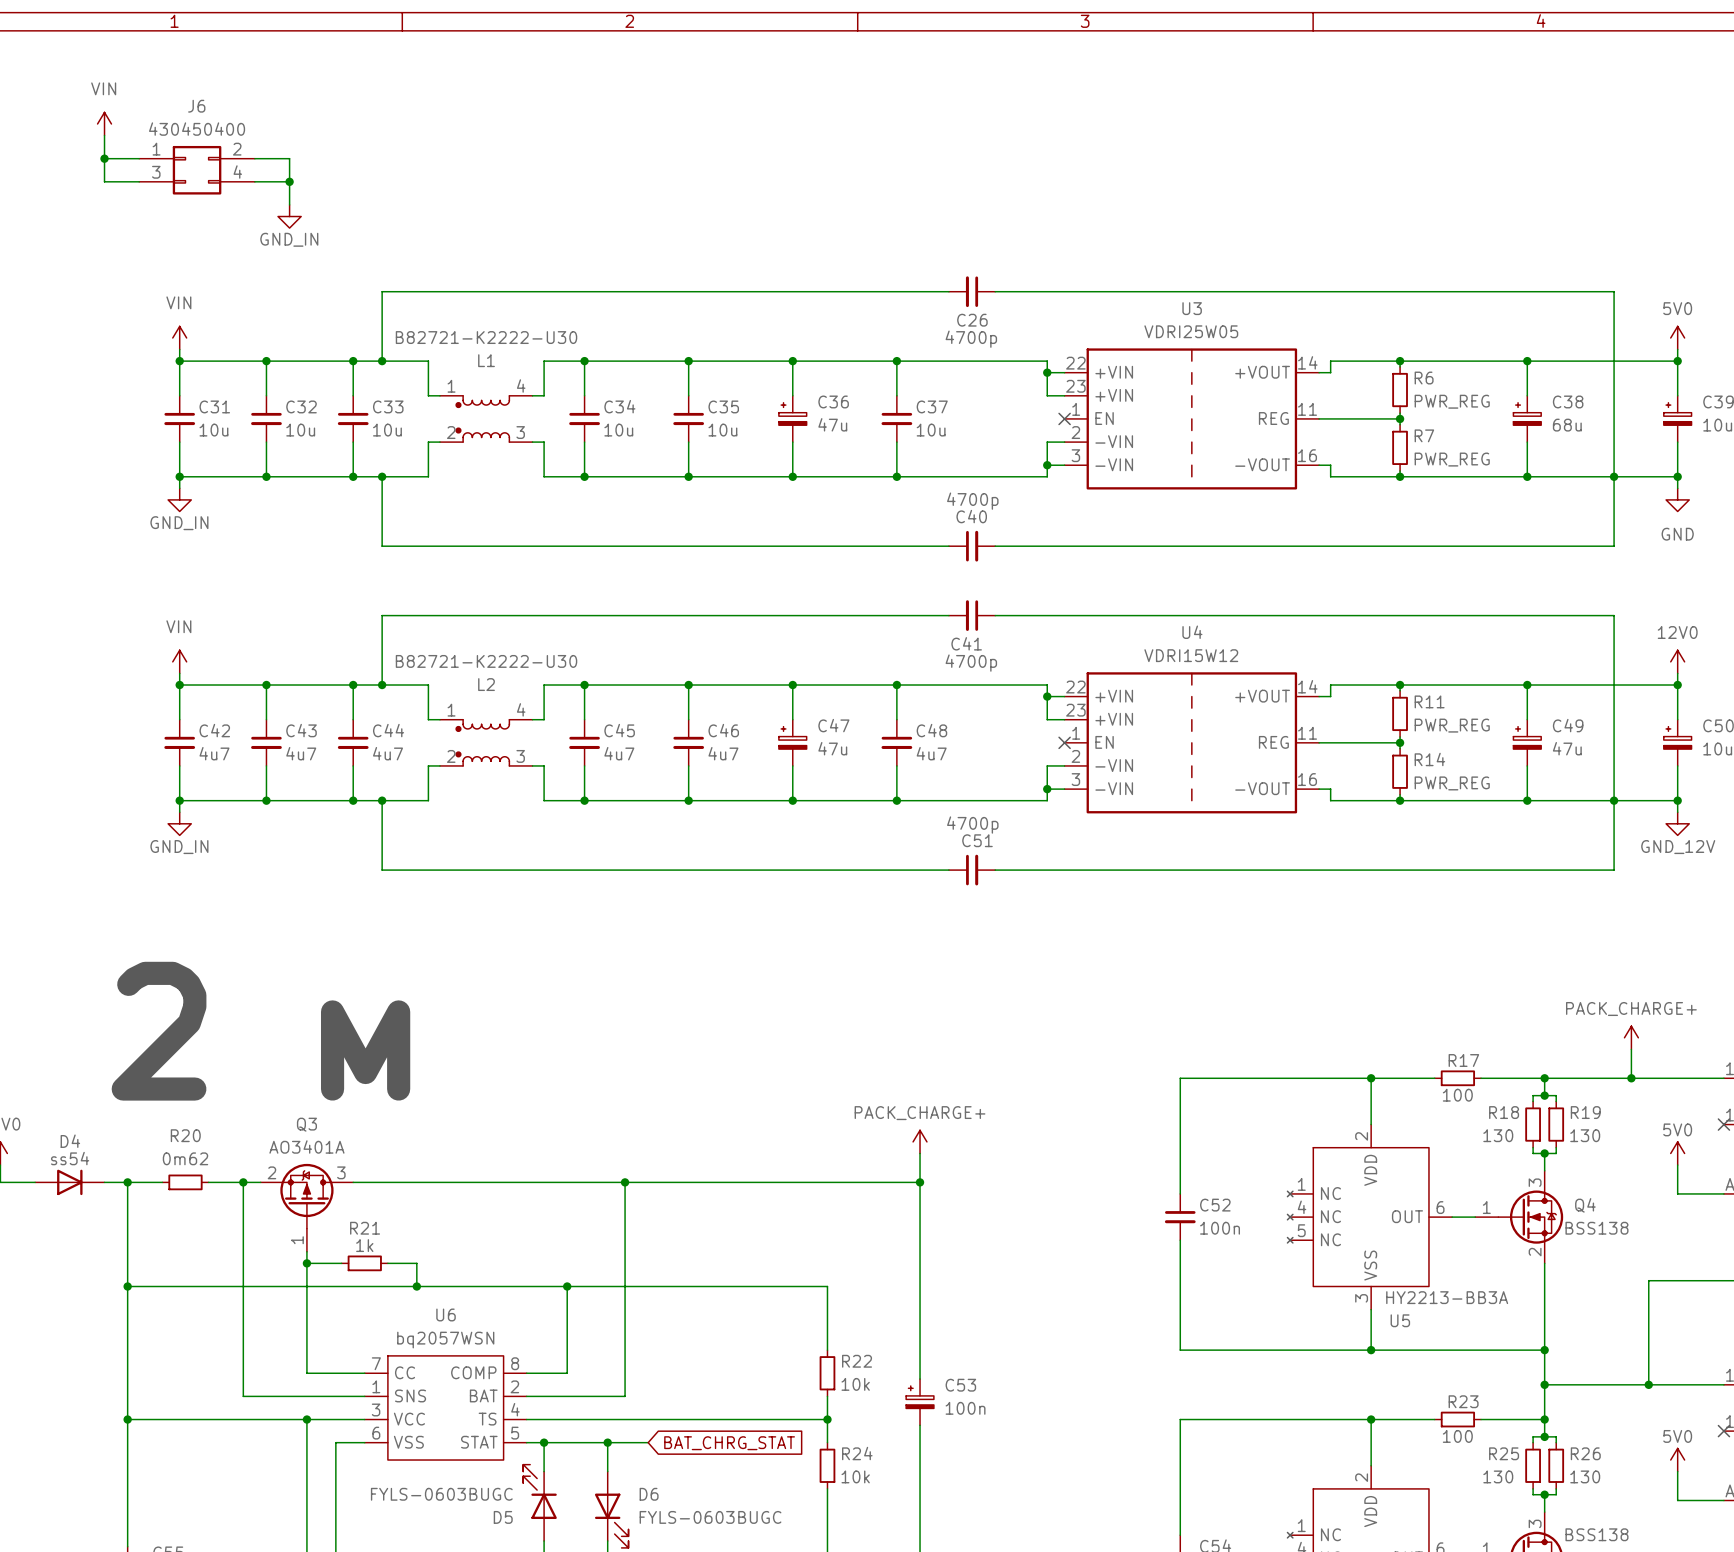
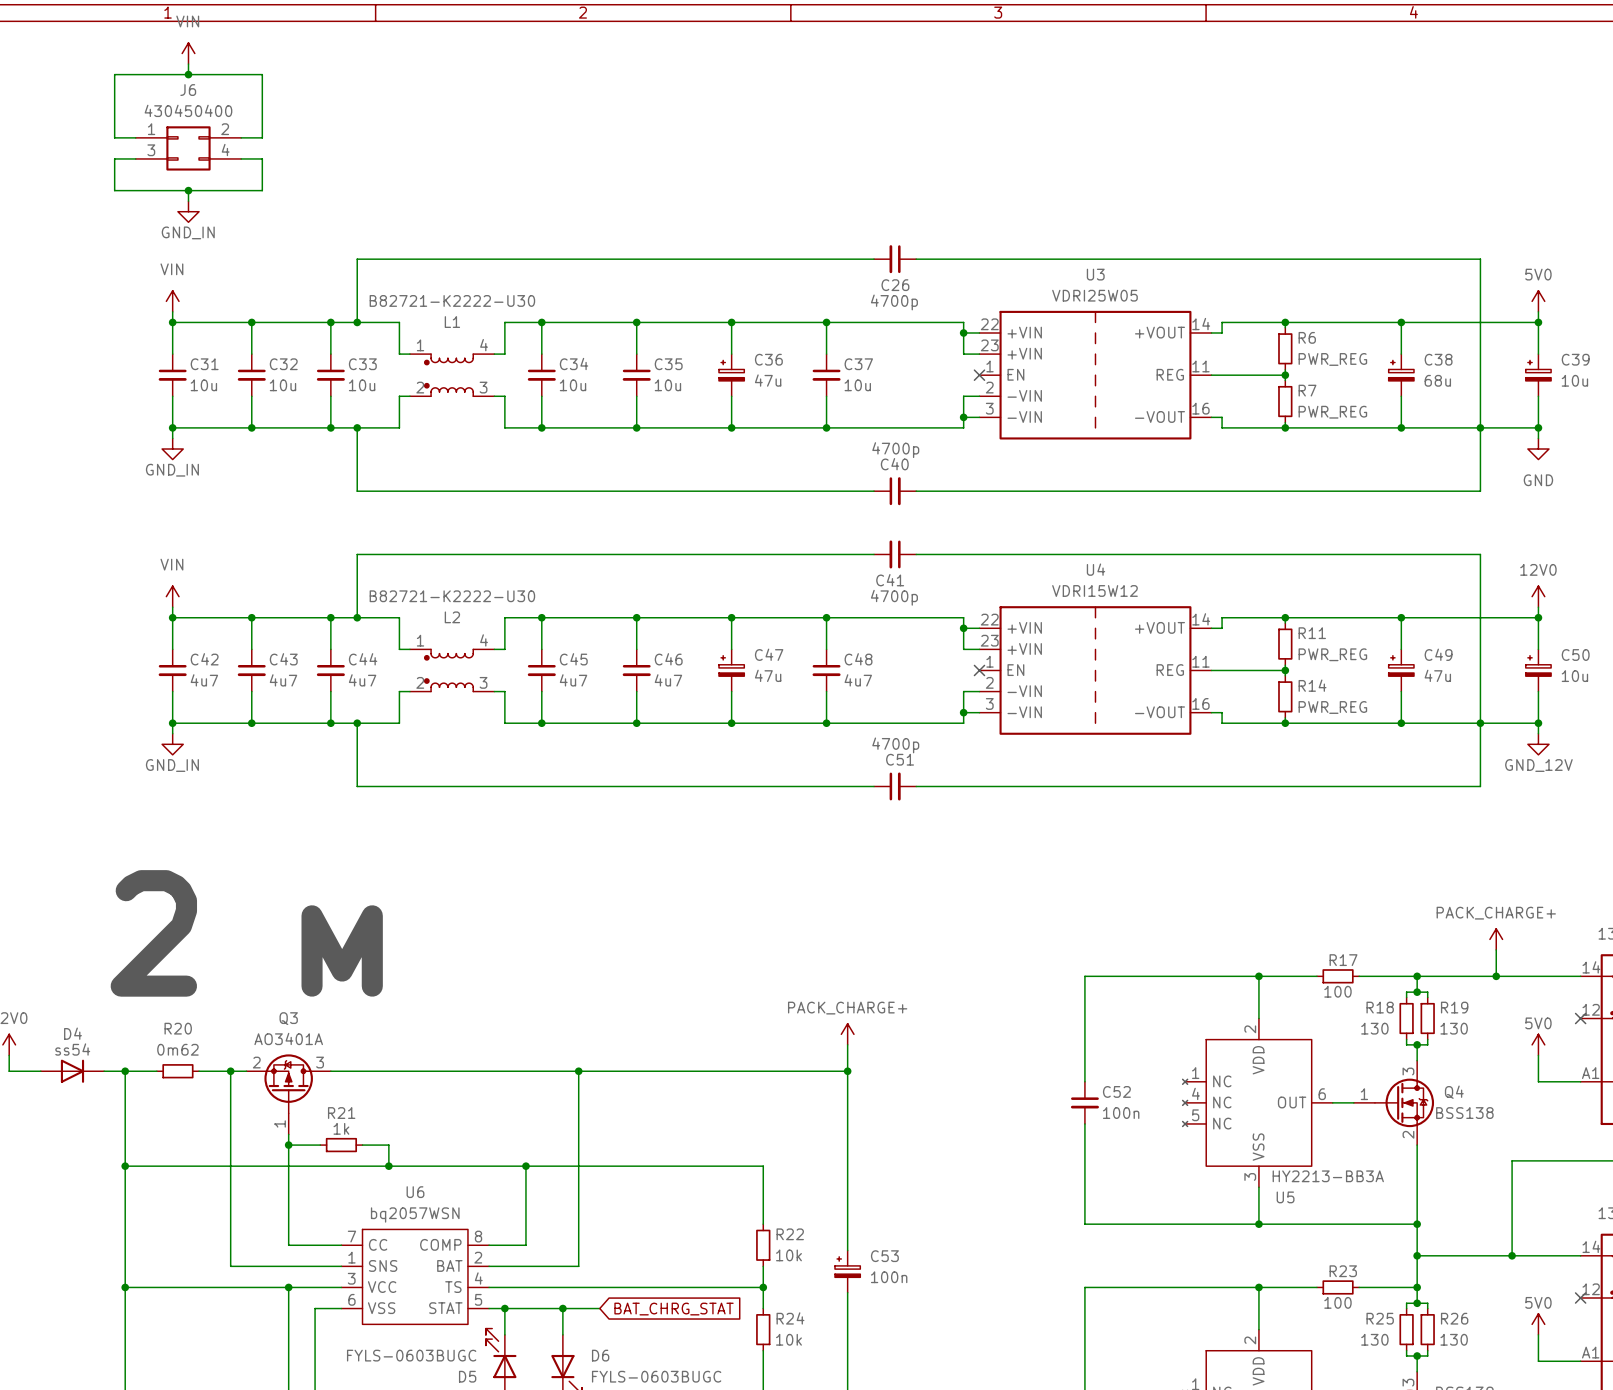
wire: none -> (188, 64) (188, 74)
junction: none -> (188, 74)
power symbol position: VIN (104, 123) -> VIN (188, 53)
wire: (104, 135) (104, 181) (116, 181) -> none
wire: (104, 158) (116, 158) -> (262, 137) (262, 74) (114, 74) (114, 137)
junction: (104, 158) -> none
wire: (278, 158) (289, 158) (289, 204) -> none
wire: (278, 181) (289, 181) -> (262, 158) (262, 190) (114, 190) (114, 158)
junction: (289, 181) -> none
wire: none -> (188, 190) (188, 201)
junction: none -> (188, 190)
power symbol position: GND_IN (289, 216) -> GND_IN (188, 211)

